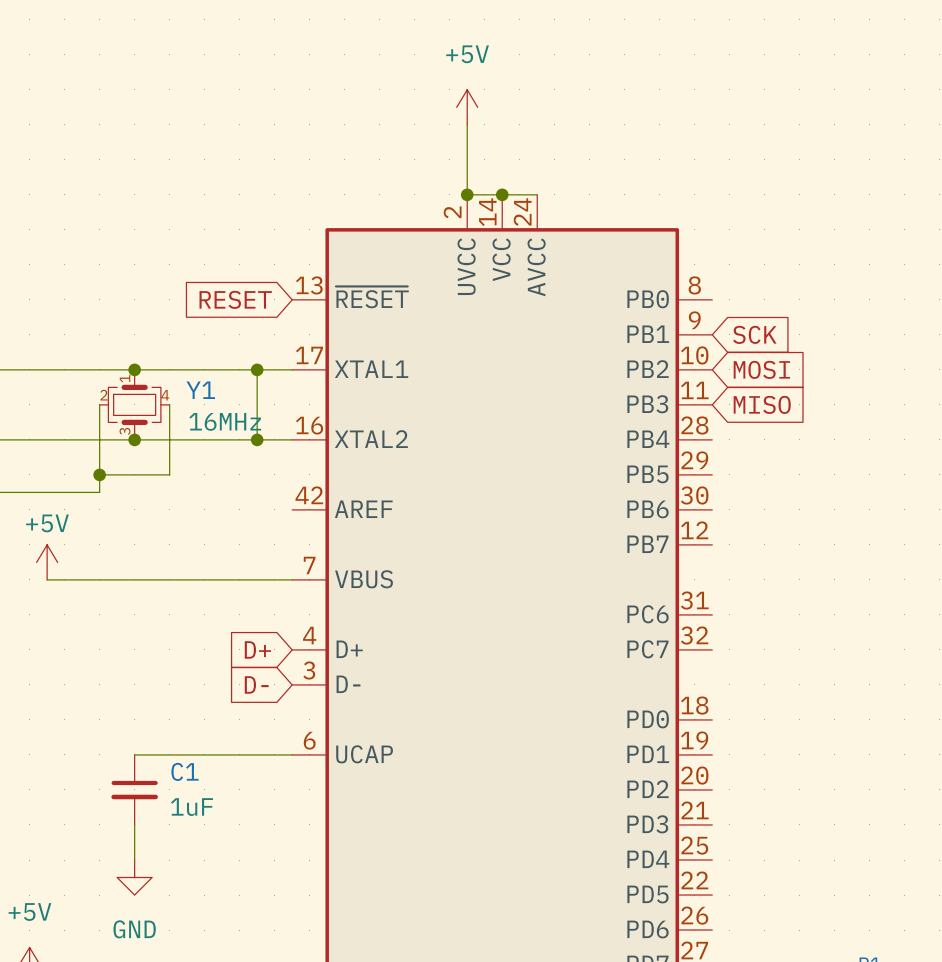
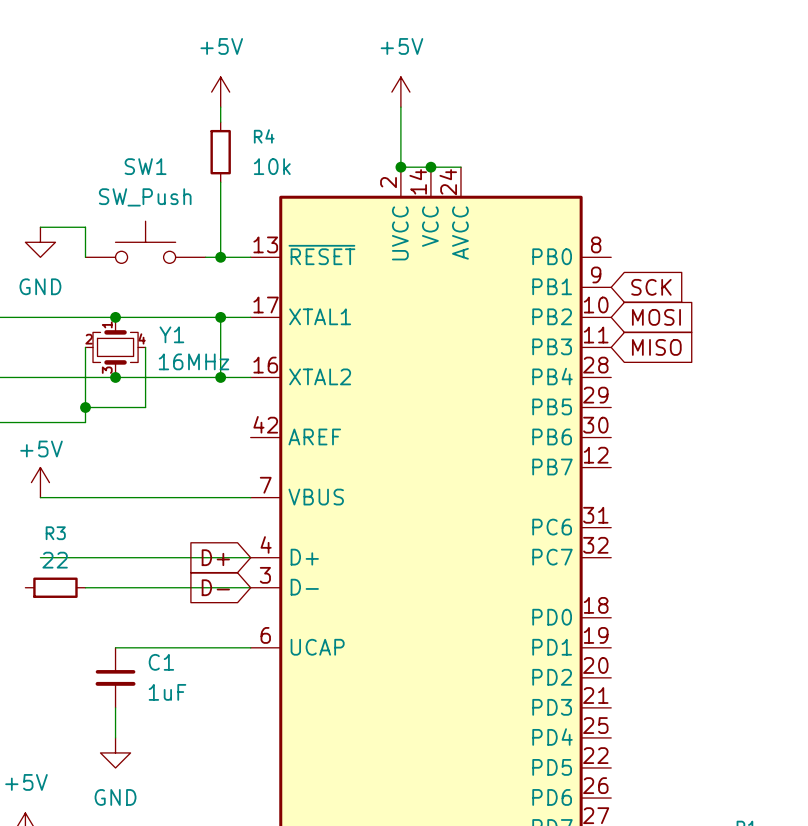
power symbol: none -> +5V (220, 92)
wire: none -> (220, 107) (220, 122)
R4: none -> 10k (220, 152)
wire: none -> (220, 182) (220, 257)
wire: none -> (40, 227) (85, 227) (85, 257)
power symbol: none -> GND (40, 242)
SW1: none -> SW_Push (145, 242)
global label: RESET (235, 299) -> none
wire: none -> (205, 257) (250, 257)
junction: none -> (220, 257)
wire: none -> (40, 557) (250, 557)
R3: none -> 22 (55, 587)
wire: none -> (85, 587) (250, 587)

